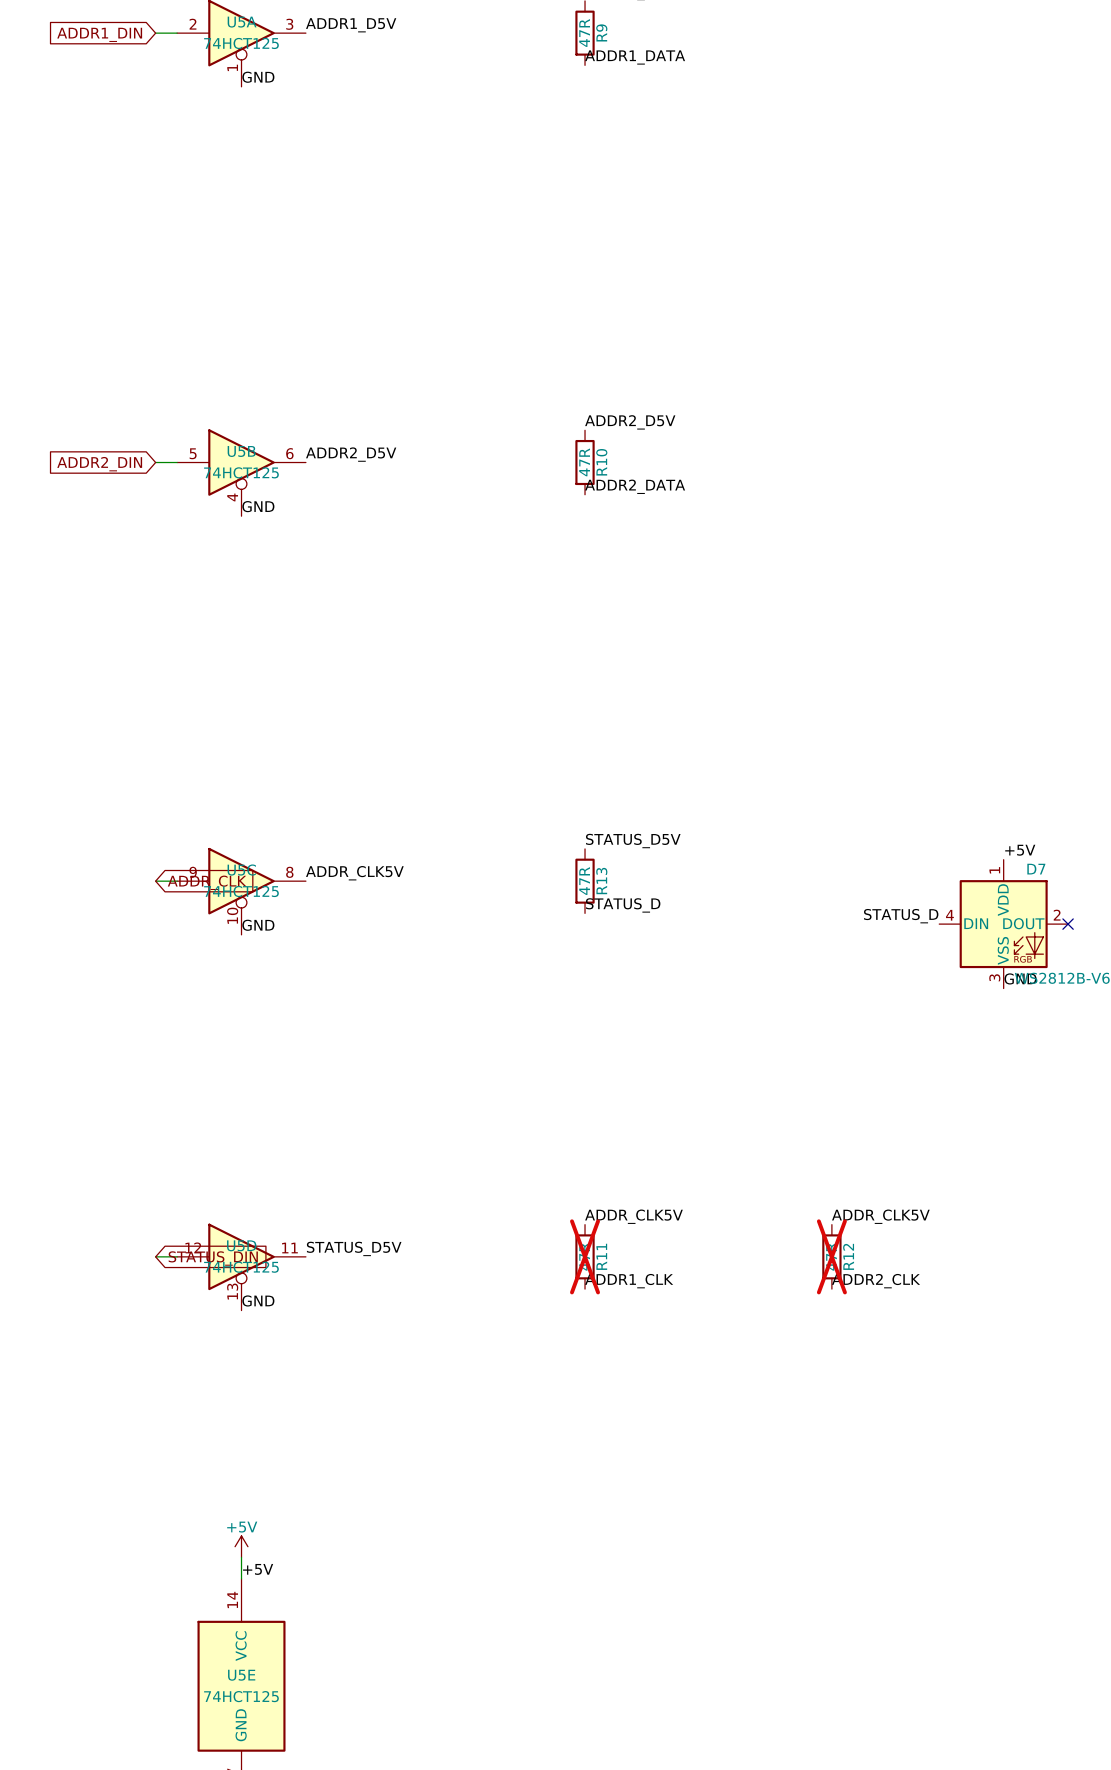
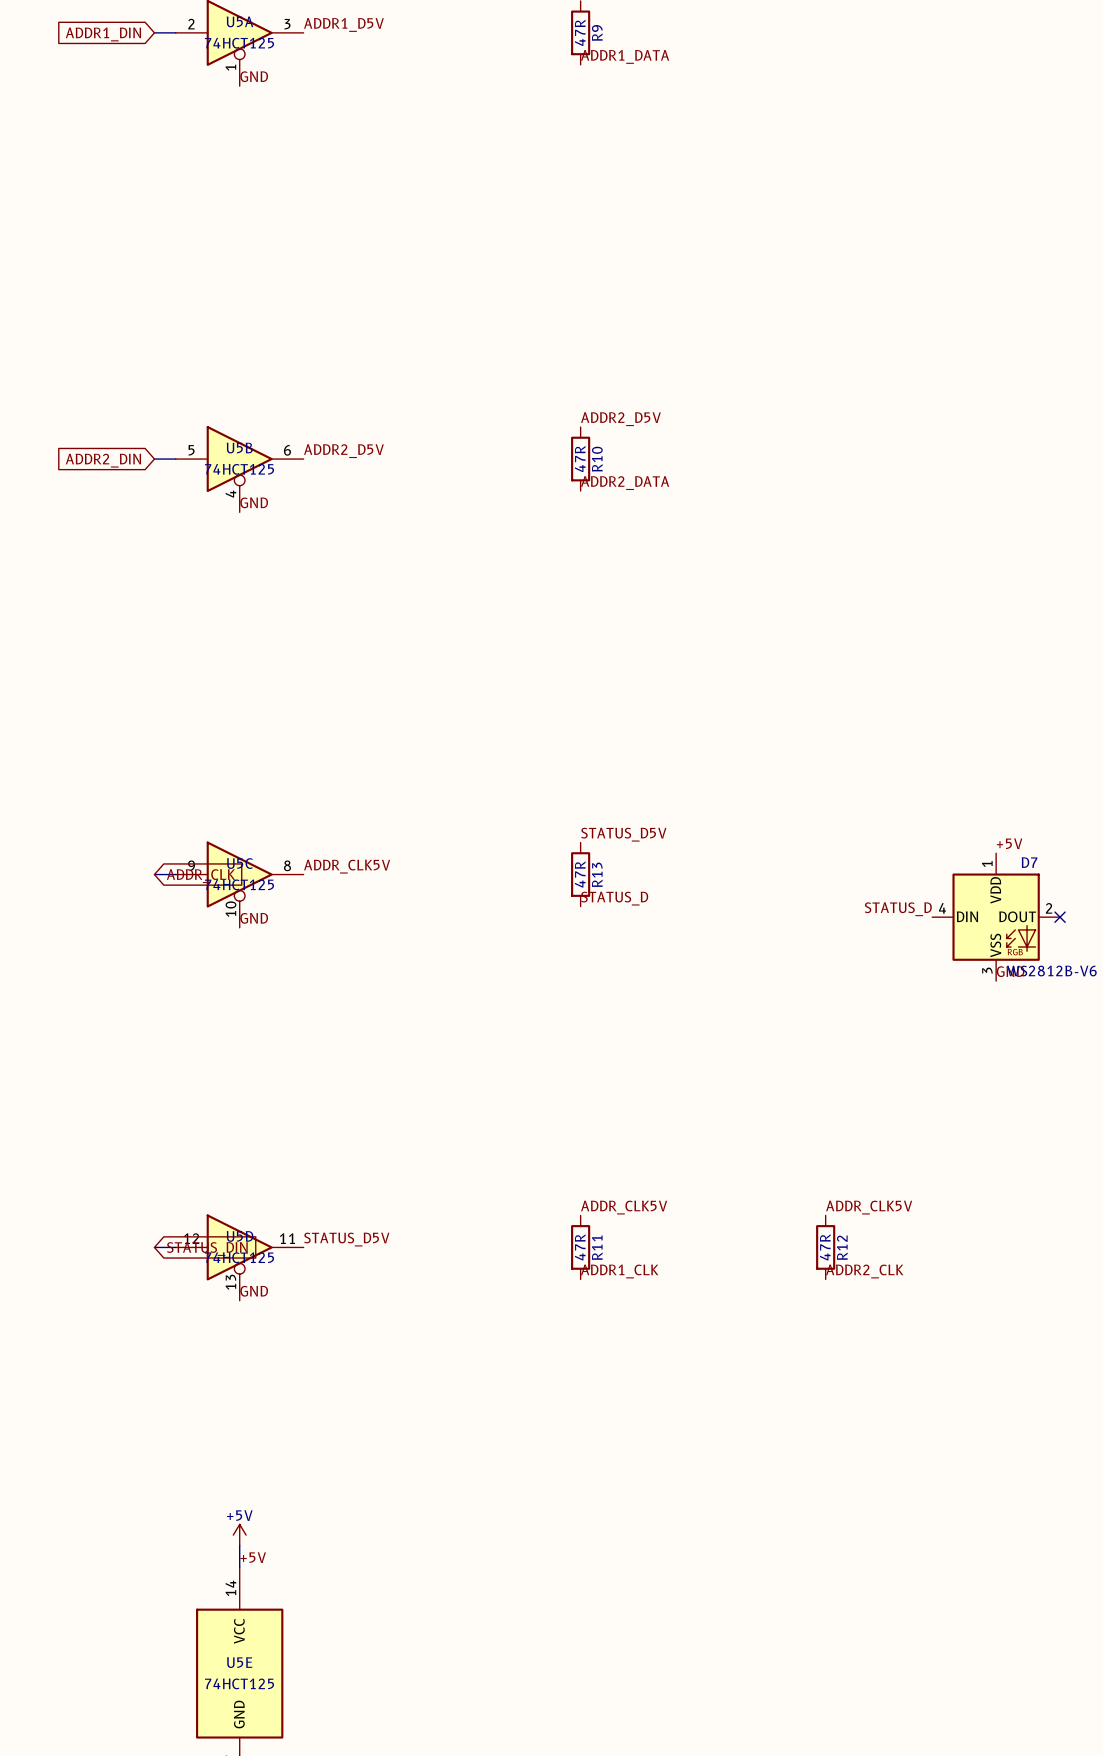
R11 do-not-place cross: (585, 1256) -> none
R12 do-not-place cross: (831, 1256) -> none

